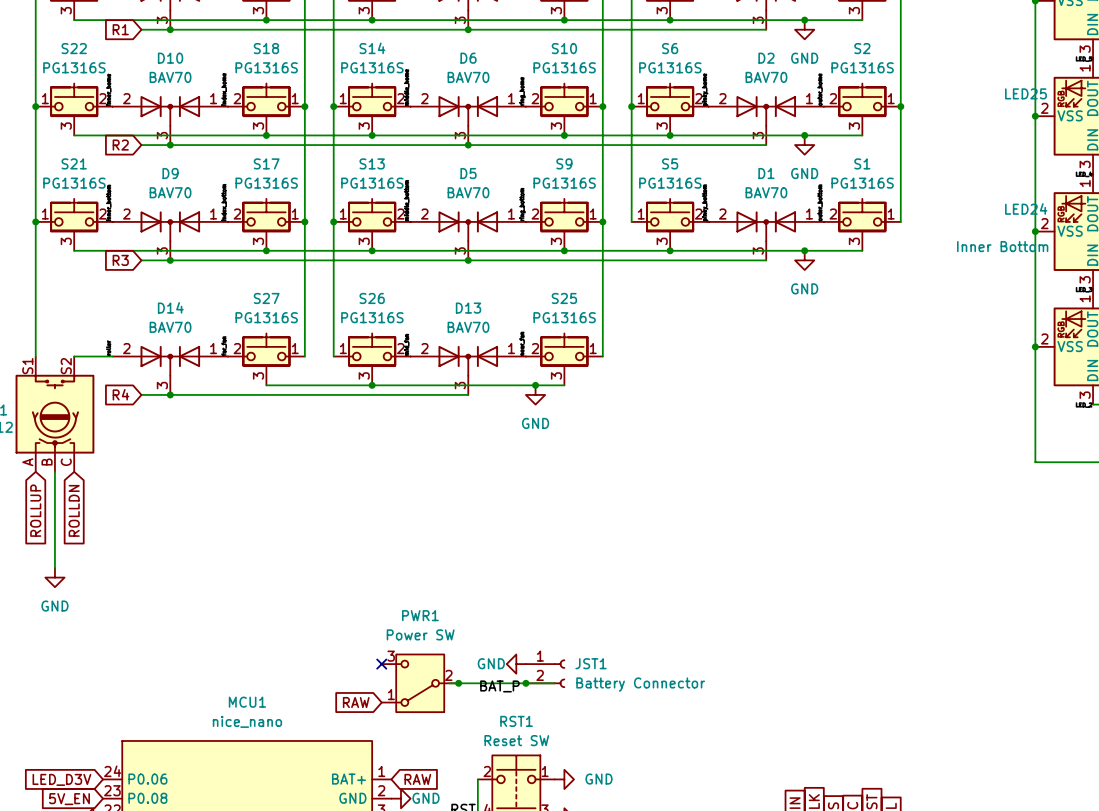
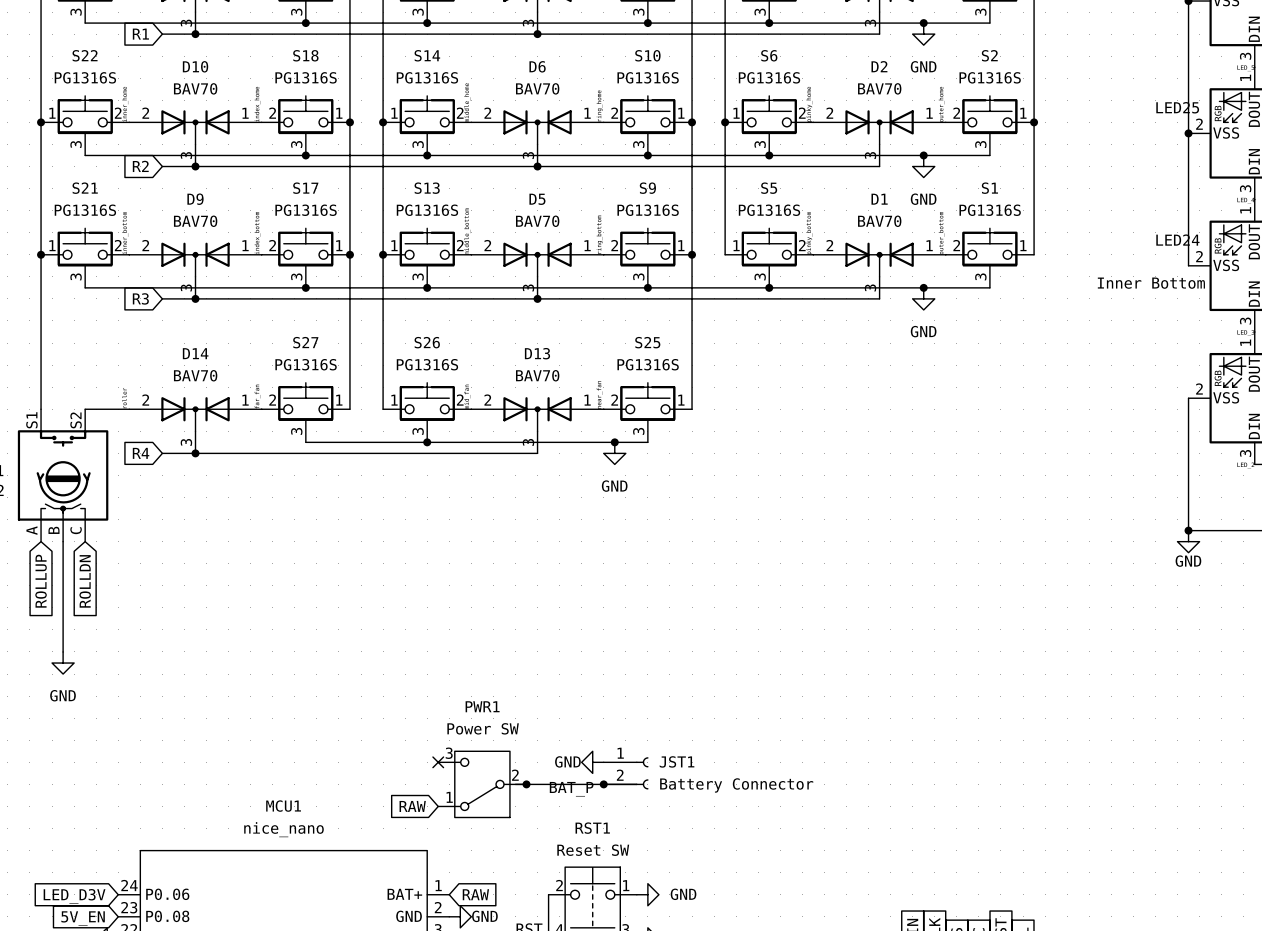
wire: (1035, 231) (1035, 346) -> none
junction: (1035, 231) -> none
junction: (1035, 346) -> none
junction: none -> (1188, 530)
power symbol: none -> GND (1188, 541)

